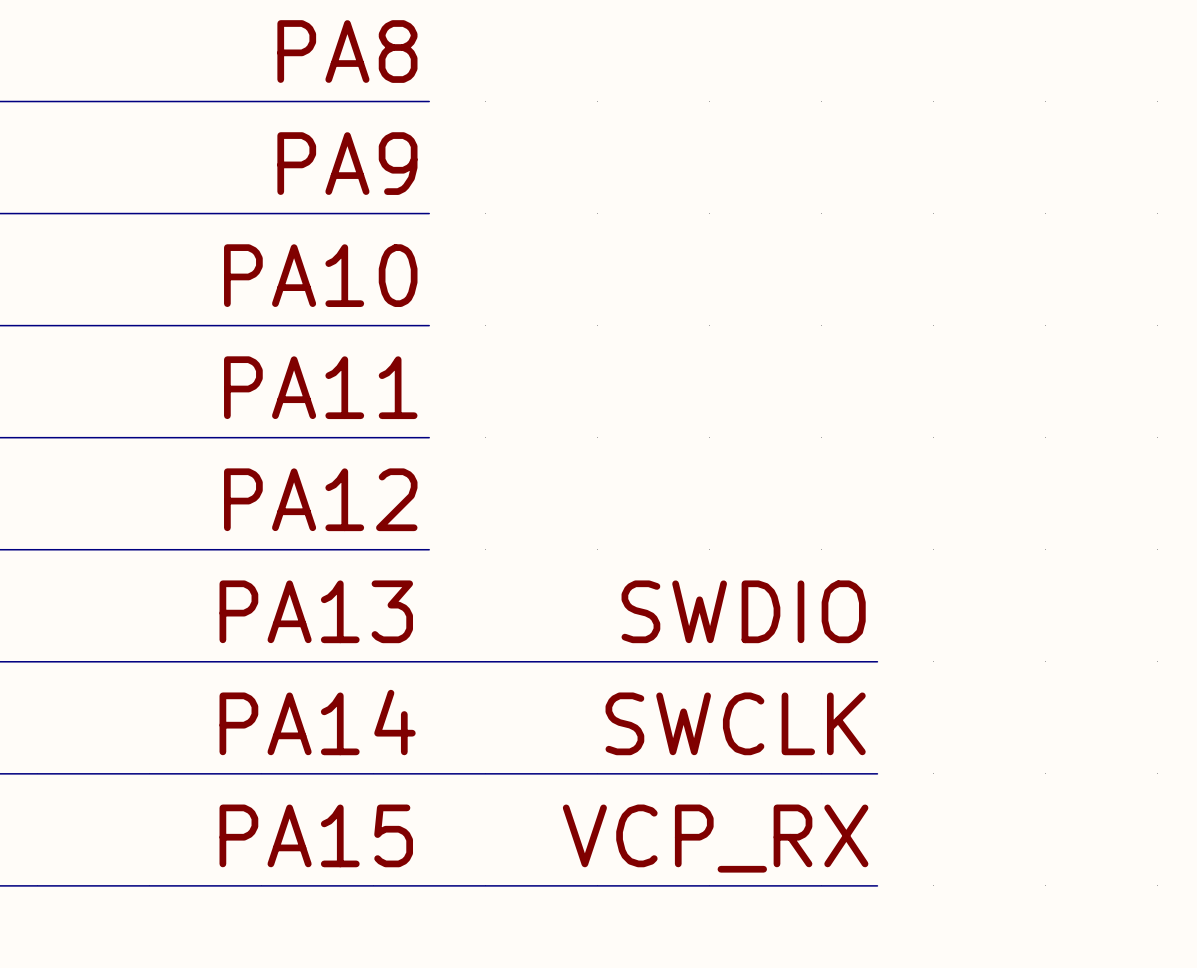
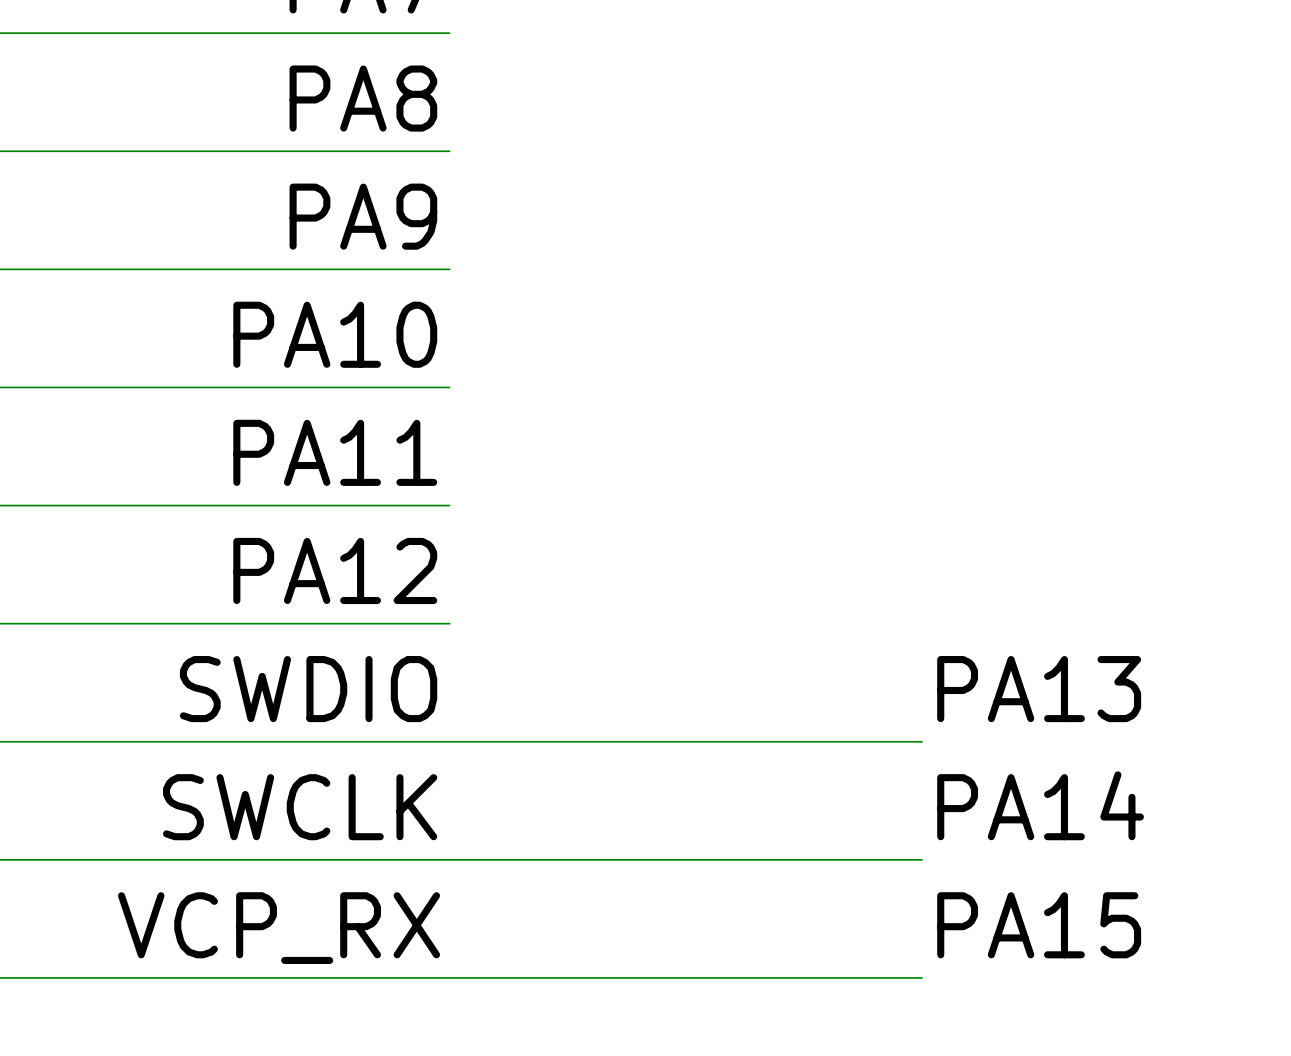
label: none -> SWDIO (308, 689)
label: PA13 (316, 611) -> none
label: SWDIO (743, 611) -> PA13 (1039, 689)
label: PA14 (317, 722) -> none
label: none -> SWCLK (300, 807)
label: SWCLK (735, 723) -> PA14 (1040, 805)
label: PA15 (316, 835) -> none
label: none -> VCP_RX (279, 928)
label: VCP_RX (715, 838) -> PA15 (1039, 925)

